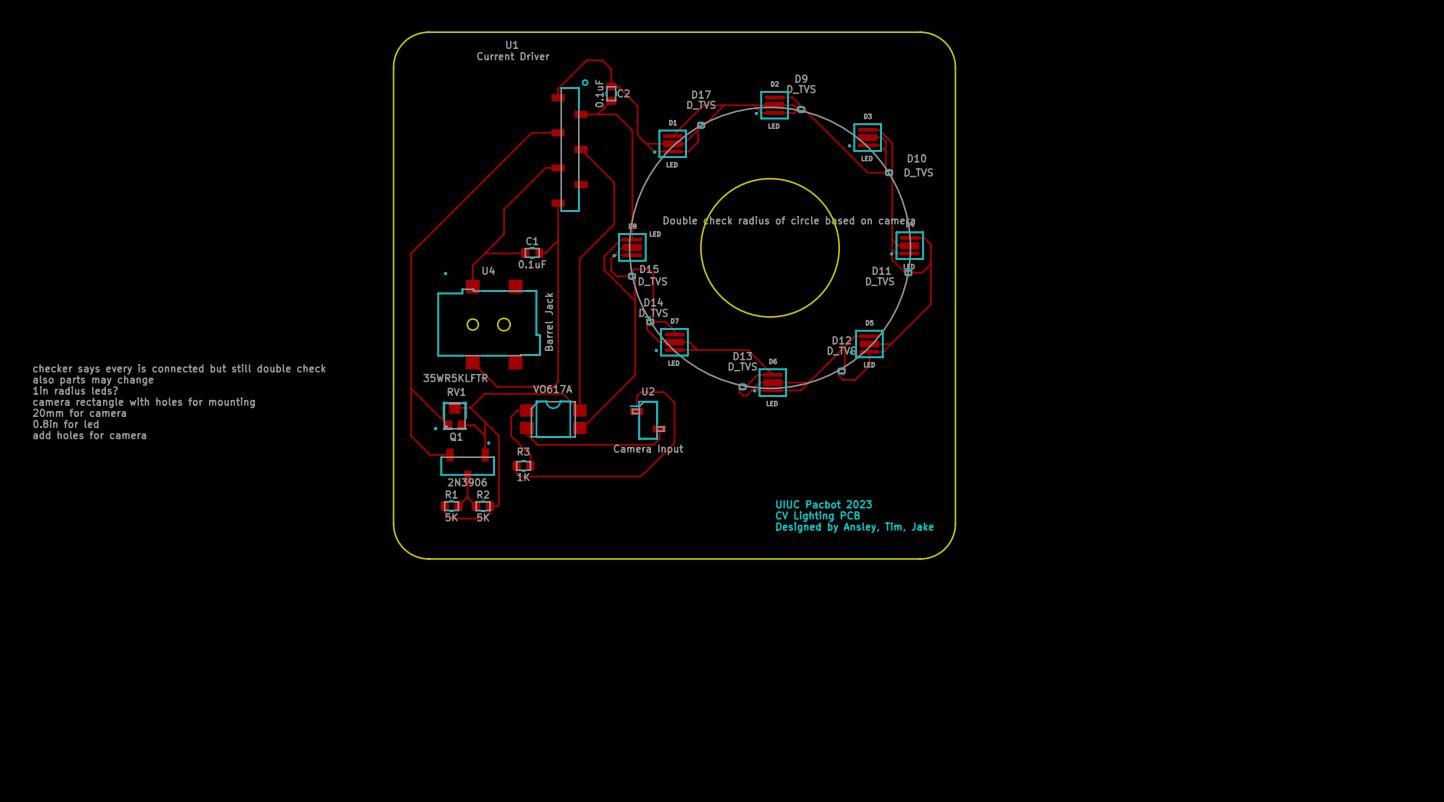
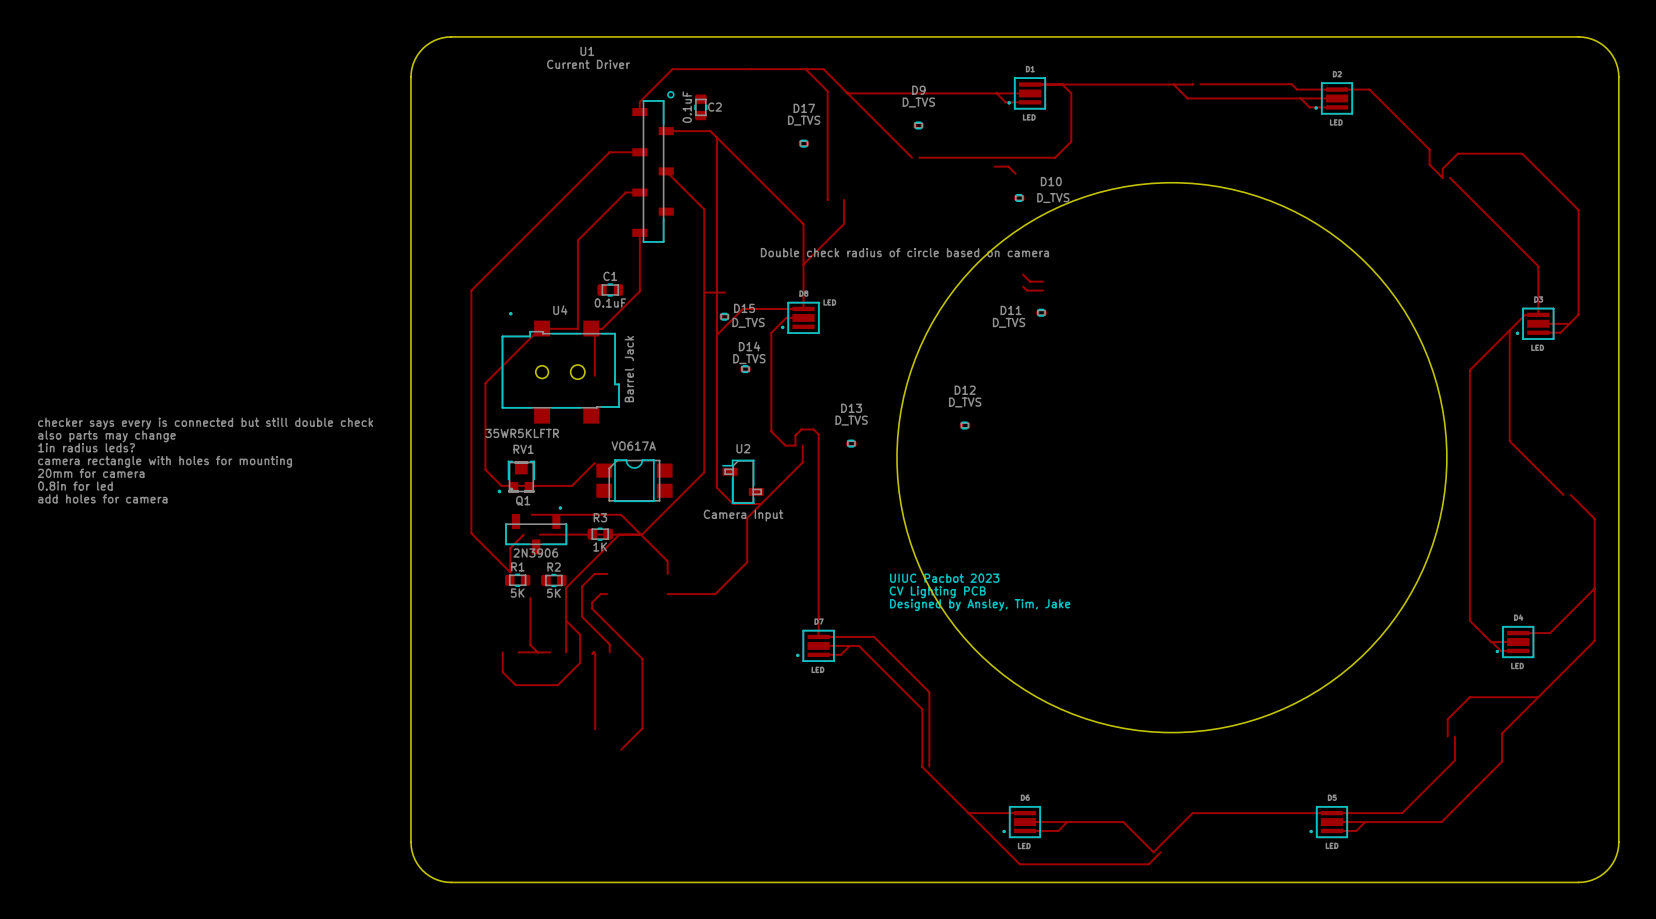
board edge: (428, 32) (413, 35) (403, 42) (397, 52) (393, 67) (393, 527) (398, 542) (406, 551) (417, 556) (428, 558) (920, 558) (931, 556) (945, 548) (951, 539) (955, 523) (955, 67) (951, 52) (945, 42) (935, 35) (920, 32) -> (491, 36) (446, 37) (433, 40) (419, 52) (414, 59) (411, 72) (410, 842) (414, 859) (426, 873) (437, 880) (451, 882) (1578, 882) (1591, 880) (1600, 876) (1612, 863) (1617, 851) (1618, 842) (1618, 77) (1616, 63) (1612, 55) (1600, 43) (1587, 37) (1578, 36) (1055, 36)
track: (602, 60) (611, 69) (611, 86) (618, 86) (637, 105) (637, 135) (654, 151) (688, 151) (698, 142) (698, 125) -> (690, 69) (823, 69) (912, 157)
track: none -> (805, 69) (827, 91) (827, 199)
track: none -> (1173, 84) (1187, 98) (1337, 98)
track: none -> (1193, 84) (1030, 84)
track: none -> (1200, 84) (1291, 84) (1297, 89) (1369, 89) (1429, 149) (1429, 164) (1442, 177) (1442, 168) (1457, 153) (1522, 153) (1578, 210) (1578, 314) (1560, 332) (1538, 332)
track: none -> (847, 93) (1030, 93)
track: none -> (996, 93) (1005, 102) (1030, 102)
track: none -> (1300, 98) (1309, 107) (1337, 107)
track: (774, 97) (792, 97) (867, 172) (885, 172) (885, 141) (881, 137) -> (1062, 84) (1071, 93) (1071, 141) (1055, 157) (1010, 157)
track: (611, 100) (597, 114) -> none
track: (724, 105) (704, 125) -> none
track: (753, 105) (761, 112) (794, 112) (798, 109) (793, 105) (703, 105) (672, 136) -> none
part position: (771, 105) -> (1333, 98)
drawing: [629, 107, 911, 389] -> none
track: (616, 114) (632, 130) (632, 239) -> (706, 131) (710, 131) (803, 224) (803, 308) (742, 308) (716, 334)
track: none -> (716, 137) (716, 487) (733, 503) (761, 503)
track: (698, 129) (684, 143) (646, 143) -> none
track: (867, 129) (879, 129) (892, 142) (892, 259) (905, 272) -> none
track: none -> (919, 157) (994, 157)
part position: (864, 137) -> (1534, 323)
part position: (669, 143) -> (1026, 93)
track: none -> (1449, 177) (1538, 266) (1538, 314) (1525, 314) (1469, 370) (1469, 620) (1491, 642) (1518, 642)
round board edge: none -> [896, 182, 1448, 733]
track: none -> (843, 199) (843, 223) (803, 264)
round board edge: [700, 178, 840, 318] -> none
track: (614, 224) (579, 258) (579, 410) (563, 393) (484, 393) (470, 407) -> (704, 257) (704, 472) (641, 535)
track: (504, 234) (472, 265) (472, 286) -> (577, 268) (577, 328) (539, 328) (485, 383) (485, 469) (501, 485) (572, 485) (594, 463)
track: (909, 237) (924, 237) (930, 244) (930, 304) (883, 351) (869, 351) (869, 365) (855, 379) (843, 379) (838, 375) (838, 371) -> none
track: (641, 239) (620, 239) (604, 256) (604, 269) (635, 300) -> none
track: (558, 240) (545, 252) (539, 252) -> none
part position: (906, 245) -> (1514, 642)
part position: (629, 247) -> (800, 317)
track: (632, 247) (622, 247) (611, 258) (611, 271) (616, 276) (628, 276) (634, 269) (648, 269) (653, 274) (653, 321) (665, 321) (674, 330) (674, 334) -> none
track: (525, 252) (484, 253) -> none
track: (558, 254) (558, 382) (553, 386) (497, 386) (472, 362) -> (639, 291) (602, 328) (594, 328) (594, 375)
track: (930, 263) (922, 272) (911, 272) -> none
track: (635, 276) (635, 375) (582, 428) (579, 428) -> none
track: none -> (803, 317) (786, 317) (771, 332) (771, 431) (785, 445) (795, 445) (795, 435) (801, 429) (813, 429) (818, 434) (818, 636) (873, 636) (929, 692) (929, 766)
track: none -> (1538, 323) (1569, 323)
track: none -> (1509, 330) (1509, 441) (1563, 494)
track: (647, 321) (647, 329) (659, 342) (689, 342) (697, 350) -> none
track: (869, 336) (855, 336) (800, 390) (751, 390) -> none
part position: (671, 342) -> (815, 645)
part position: (866, 343) -> (1328, 822)
track: (869, 343) (891, 343) -> none
track: (844, 346) (844, 371) -> none
track: (674, 350) (748, 350) (772, 374) (757, 374) (745, 386) -> none
part position: (769, 382) -> (1021, 822)
track: (808, 382) (759, 382) (746, 395) (742, 395) (739, 392) (739, 386) -> none
track: (411, 388) (447, 425) -> none
track: none -> (802, 445) (802, 462) (747, 518) (747, 562) (715, 594) (667, 594)
track: (454, 407) (470, 407) -> none
track: (470, 407) (498, 436) (498, 504) (490, 506) (490, 513) (484, 518) (451, 518) (444, 511) (444, 506) -> none
track: (527, 410) (517, 410) (511, 416) (511, 436) (530, 455) (530, 465) -> none
track: (636, 411) (636, 396) (641, 392) (663, 392) (674, 402) (674, 443) (641, 476) (519, 476) (516, 473) (516, 465) -> none
track: (485, 422) (485, 454) -> none
track: (461, 425) (474, 425) (485, 436) -> none
track: (527, 428) (527, 434) (537, 444) (653, 444) (659, 438) (659, 429) -> none
track: none -> (1570, 494) (1594, 518) (1594, 640) (1502, 733) (1502, 761) (1441, 822) (1331, 822)
track: (411, 436) (429, 454) (450, 454) -> (471, 499) (471, 533) (510, 572) (510, 548) (523, 534)
track: none -> (531, 514) (621, 514) (667, 561) (667, 574)
track: none -> (539, 534) (640, 534)
track: none -> (619, 534) (566, 587) (566, 652)
track: (467, 477) (467, 497) (476, 506) -> none
track: (467, 496) (458, 506) -> none
track: none -> (607, 574) (594, 574) (582, 586) (582, 616) (609, 644) (609, 652)
track: none -> (1594, 588) (1550, 633) (1518, 633)
track: none -> (607, 594) (600, 594) (592, 602) (592, 608) (642, 658) (642, 728) (621, 749)
track: none -> (530, 597) (530, 645) (537, 652)
track: none -> (566, 620) (580, 634) (580, 663) (557, 685) (515, 685) (502, 672) (502, 652)
track: none -> (1492, 642) (1500, 650) (1518, 650)
track: none -> (818, 645) (858, 645) (922, 709) (922, 766) (968, 813) (1024, 813)
track: none -> (849, 645) (840, 654) (818, 654)
track: none -> (518, 652) (550, 652)
track: none -> (592, 654) (595, 653) (595, 729)
track: none -> (1538, 697) (1469, 697) (1447, 719) (1447, 736)
track: none -> (1454, 736) (1454, 760) (1402, 813) (1192, 813) (1153, 852) (1123, 822) (1024, 822)
track: none -> (968, 813) (1019, 864) (1148, 864) (1160, 852)
track: none -> (1067, 822) (1058, 830) (1024, 830)
track: none -> (1365, 822) (1356, 830) (1331, 830)

